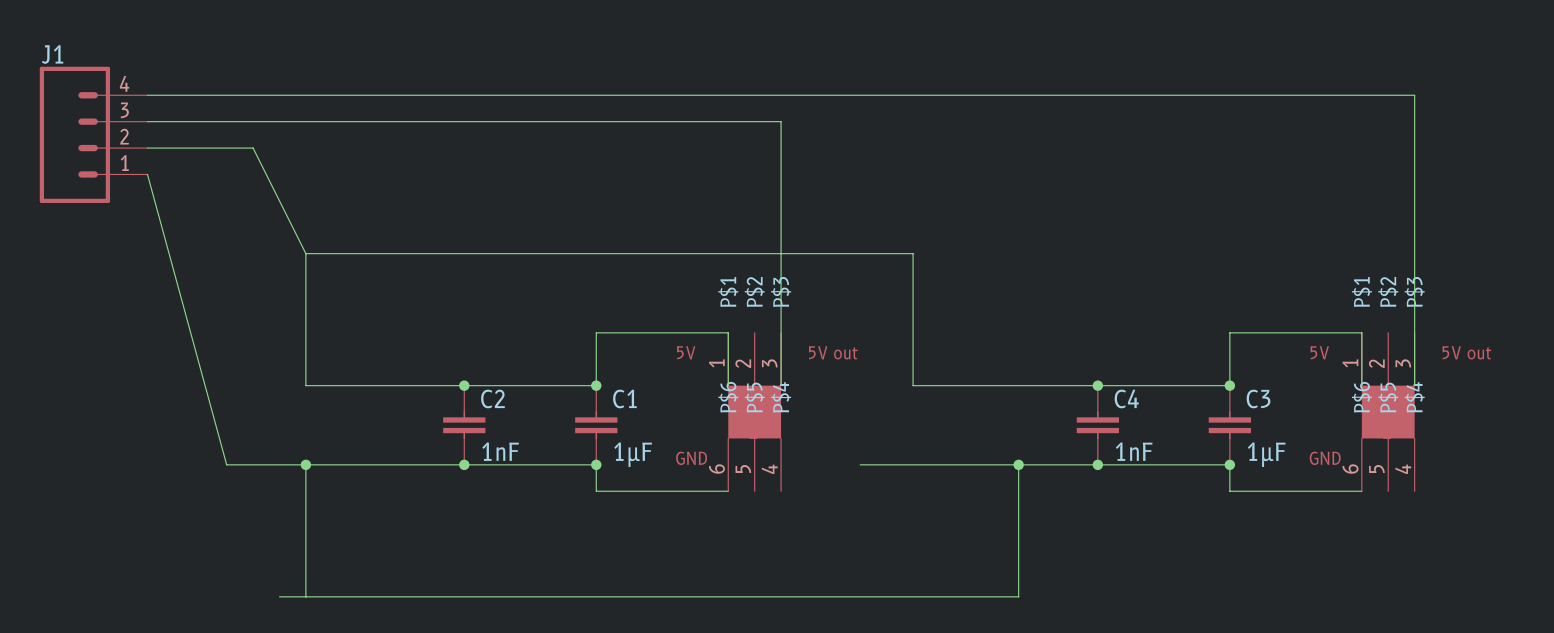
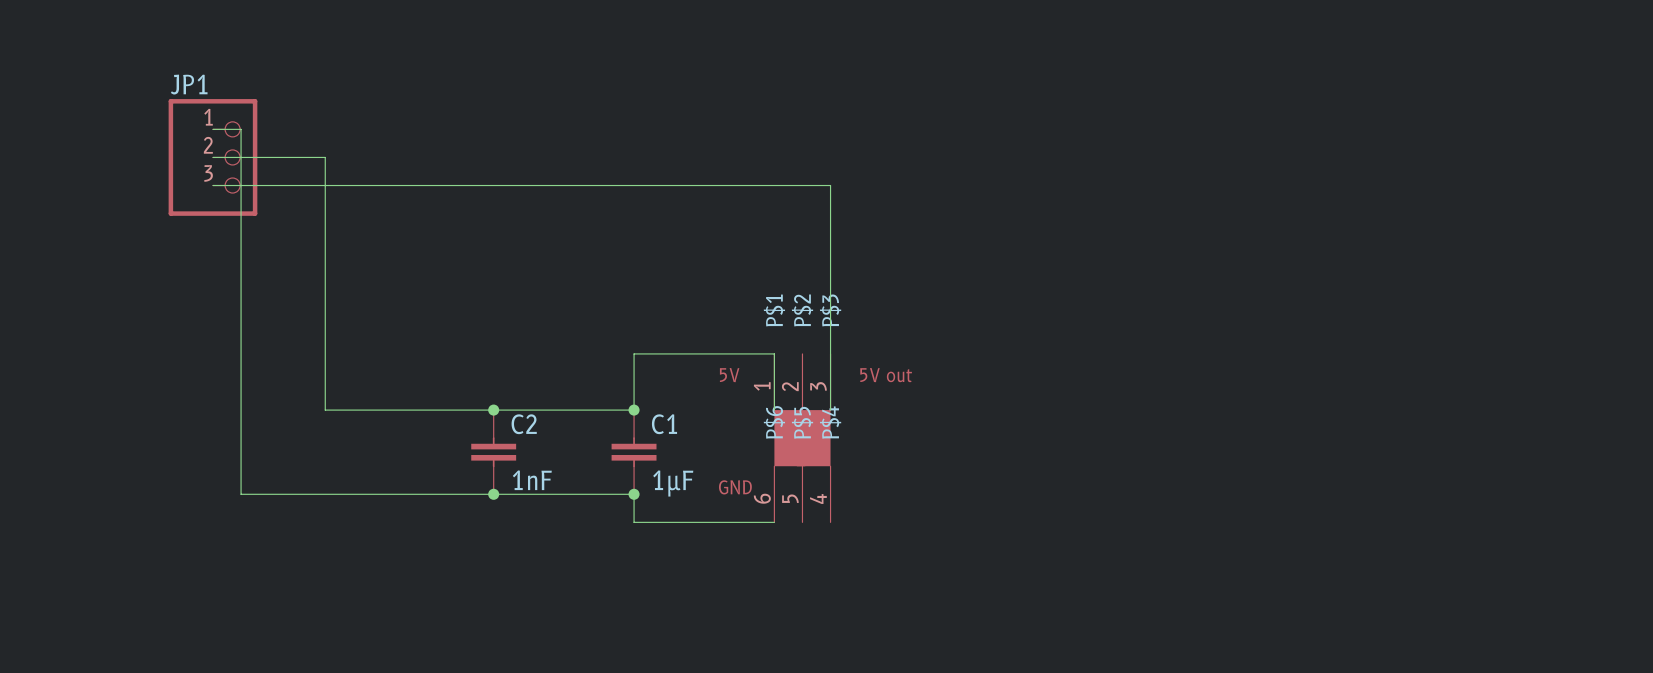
wire: (147, 95) (1414, 95) (1414, 385) -> none
wire: (147, 121) (200, 121) -> none
wire: (226, 121) (781, 121) (781, 174) -> (212, 185) (830, 185)
J1: (93, 134) -> none
wire: (147, 148) (200, 148) -> none
JP1: none -> (212, 157)
wire: (253, 148) (305, 253) (913, 253) (913, 385) (1229, 385) (1229, 332) (1361, 332) (1361, 385) -> (269, 157) (325, 157) (325, 269)
wire: (147, 174) (226, 464) -> (241, 129) (241, 494)
junction: (1097, 385) -> none
junction: (1229, 385) -> none
part: (1388, 412) -> none
C4: 1nF (1097, 425) -> none
C3: 1µF (1229, 425) -> none
wire: (305, 464) (305, 596) -> none
junction: (305, 464) -> none
wire: (860, 464) (1229, 464) (1229, 491) (1361, 491) -> none
wire: (1018, 464) (1018, 596) (279, 596) -> none
junction: (1018, 464) -> none
junction: (1097, 464) -> none
junction: (1229, 464) -> none

